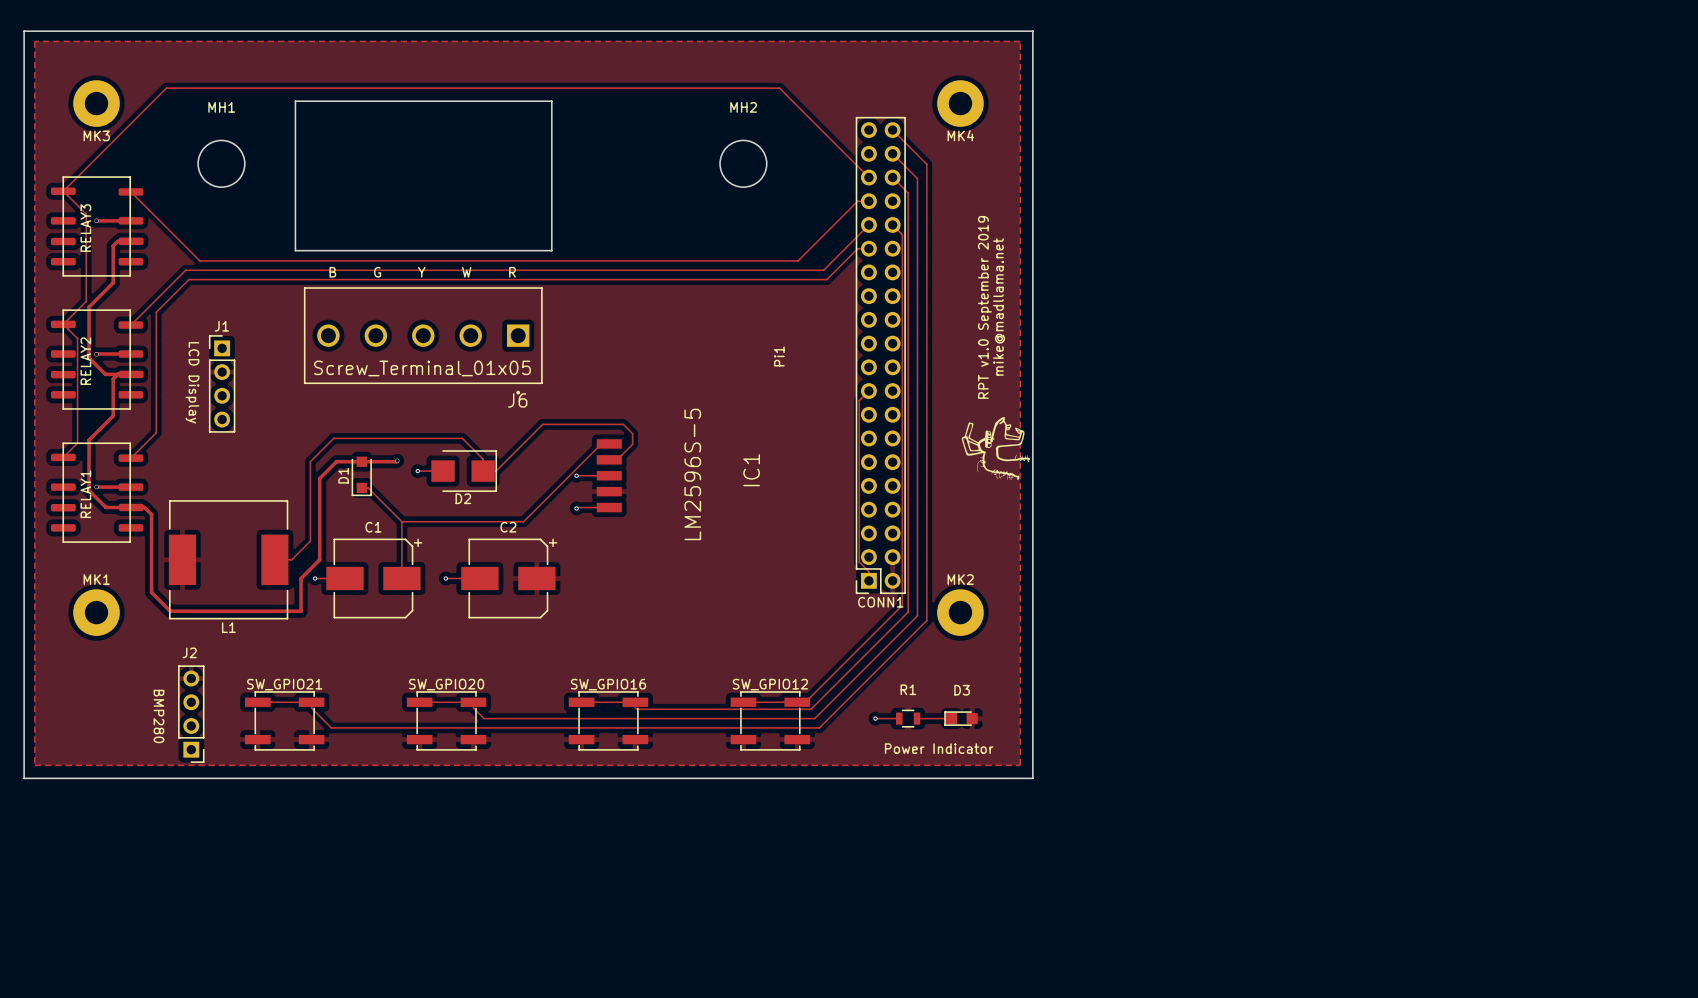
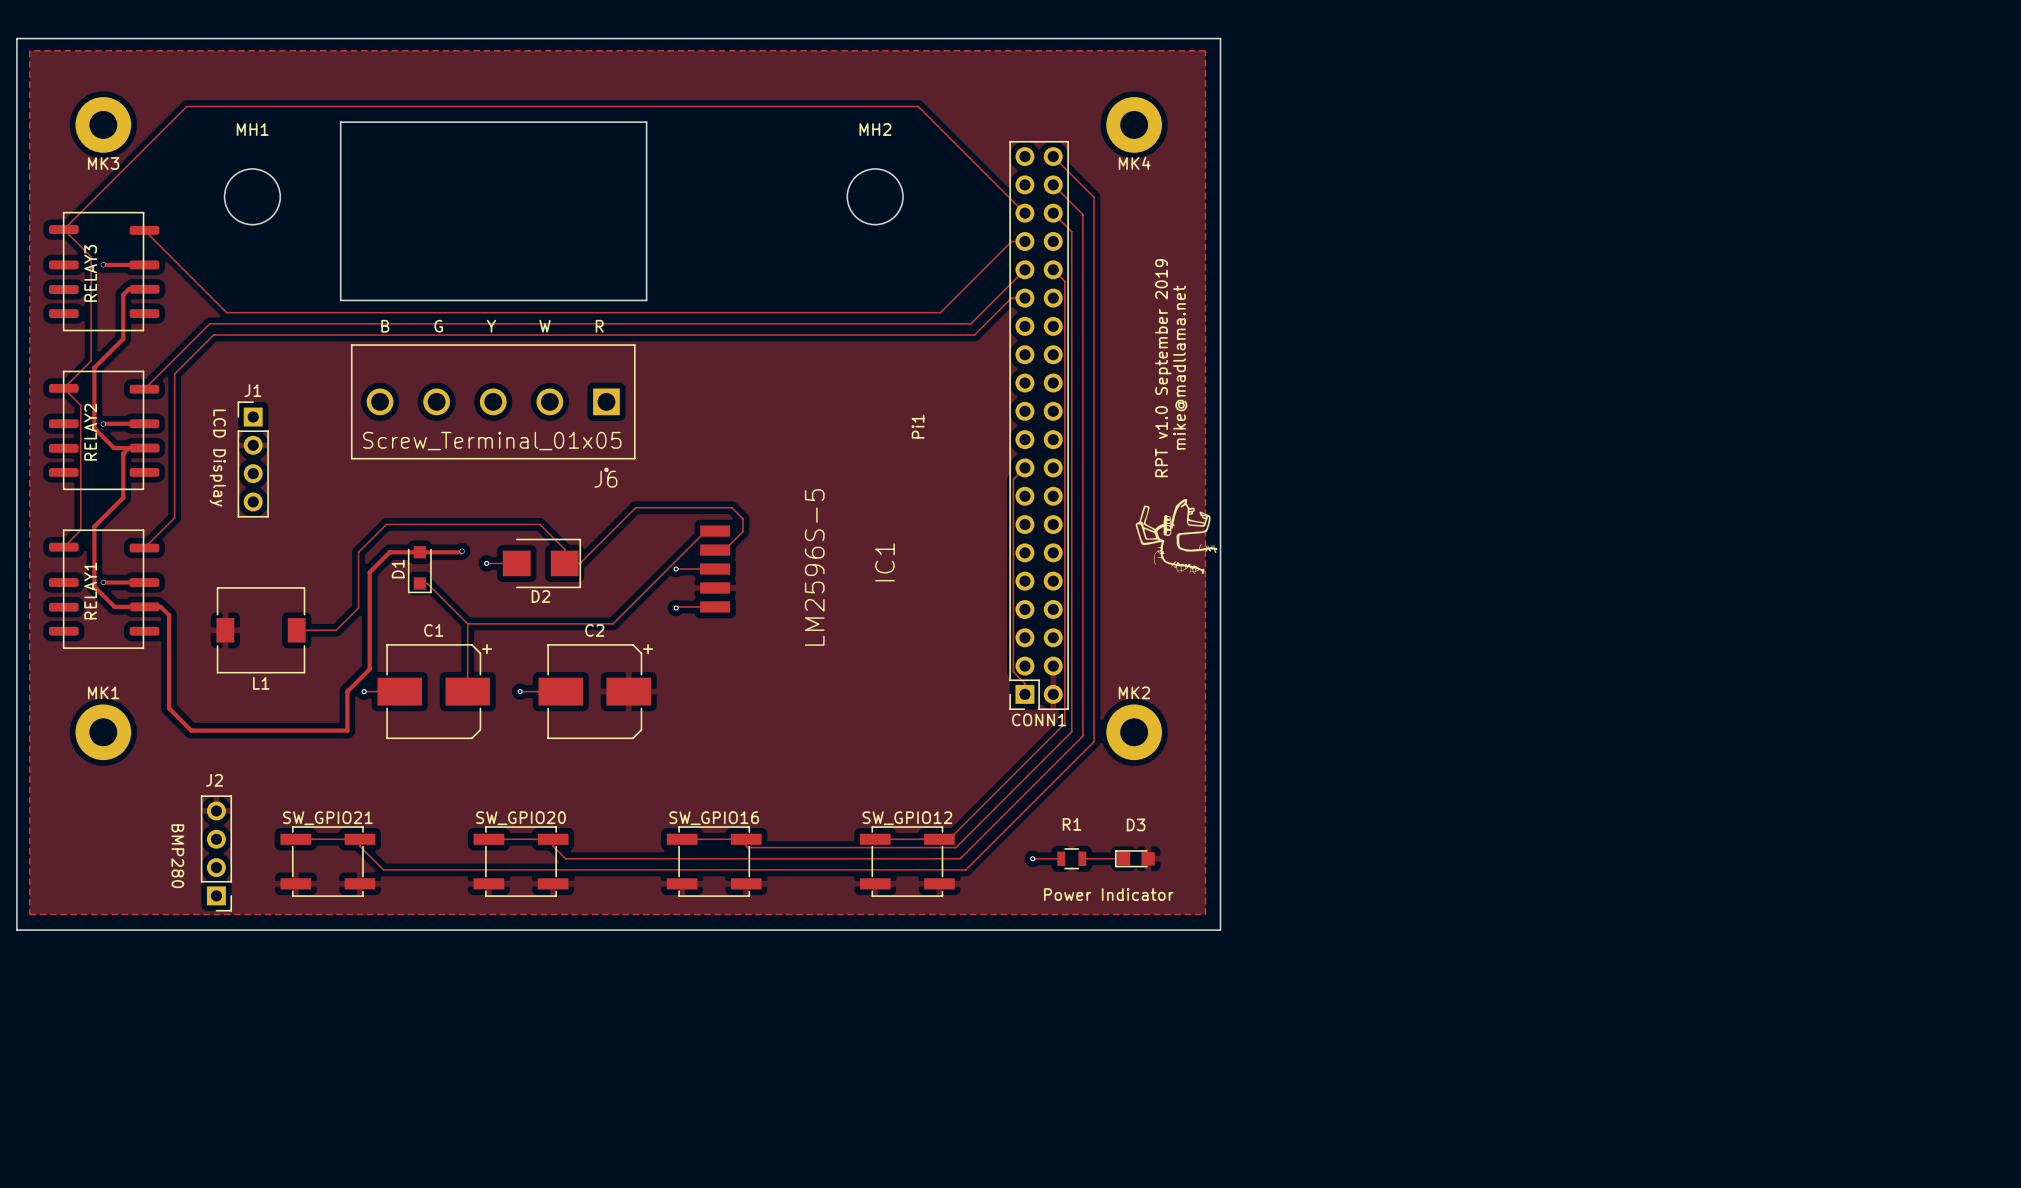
L1 footprint: [168, 500, 289, 620] -> [216, 587, 306, 674]
track: (310, 508) (310, 541) (291, 559) (274, 559) -> (358, 608) (336, 630) (296, 630)
L1 name position: L1 (228, 627) -> L1 (261, 683)

